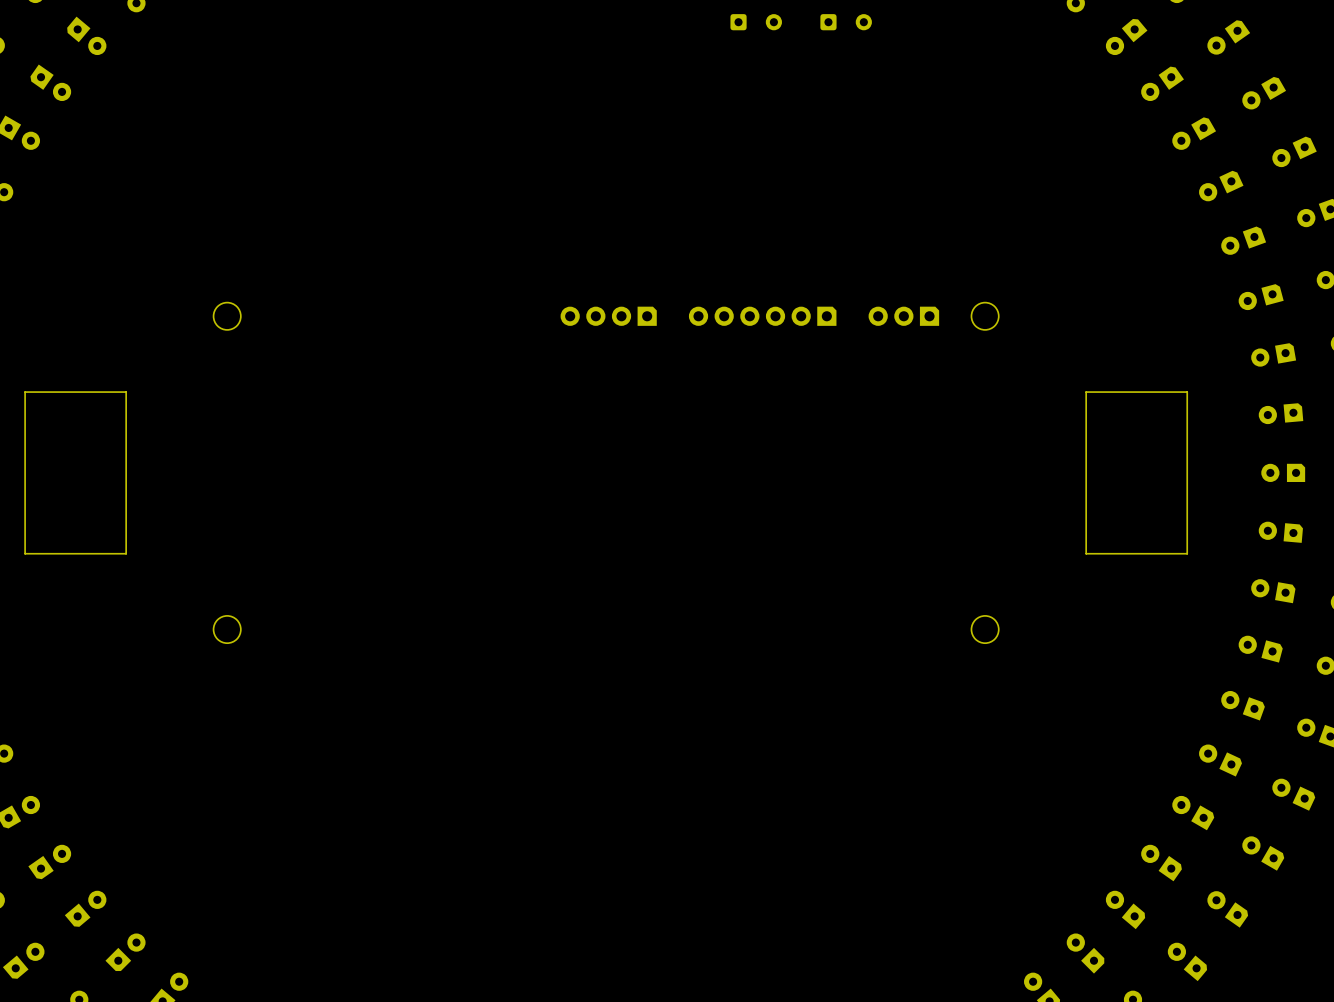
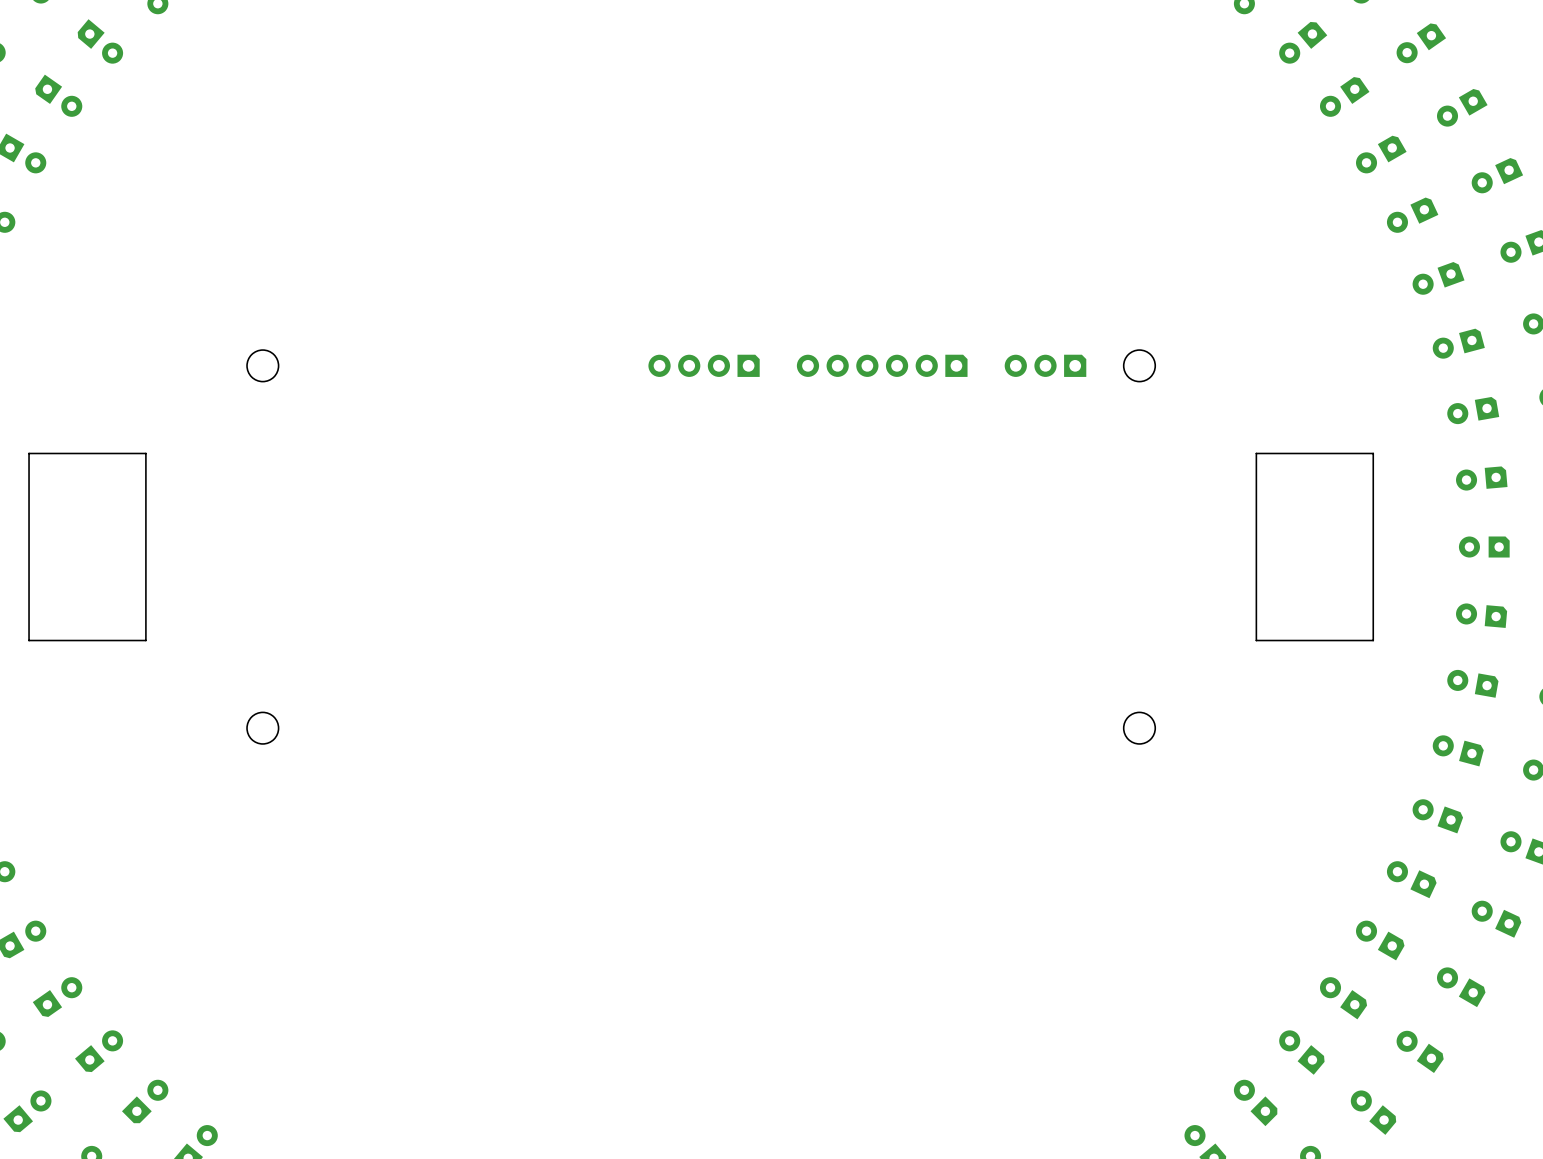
part: (756, 22) -> none
part: (846, 22) -> none

